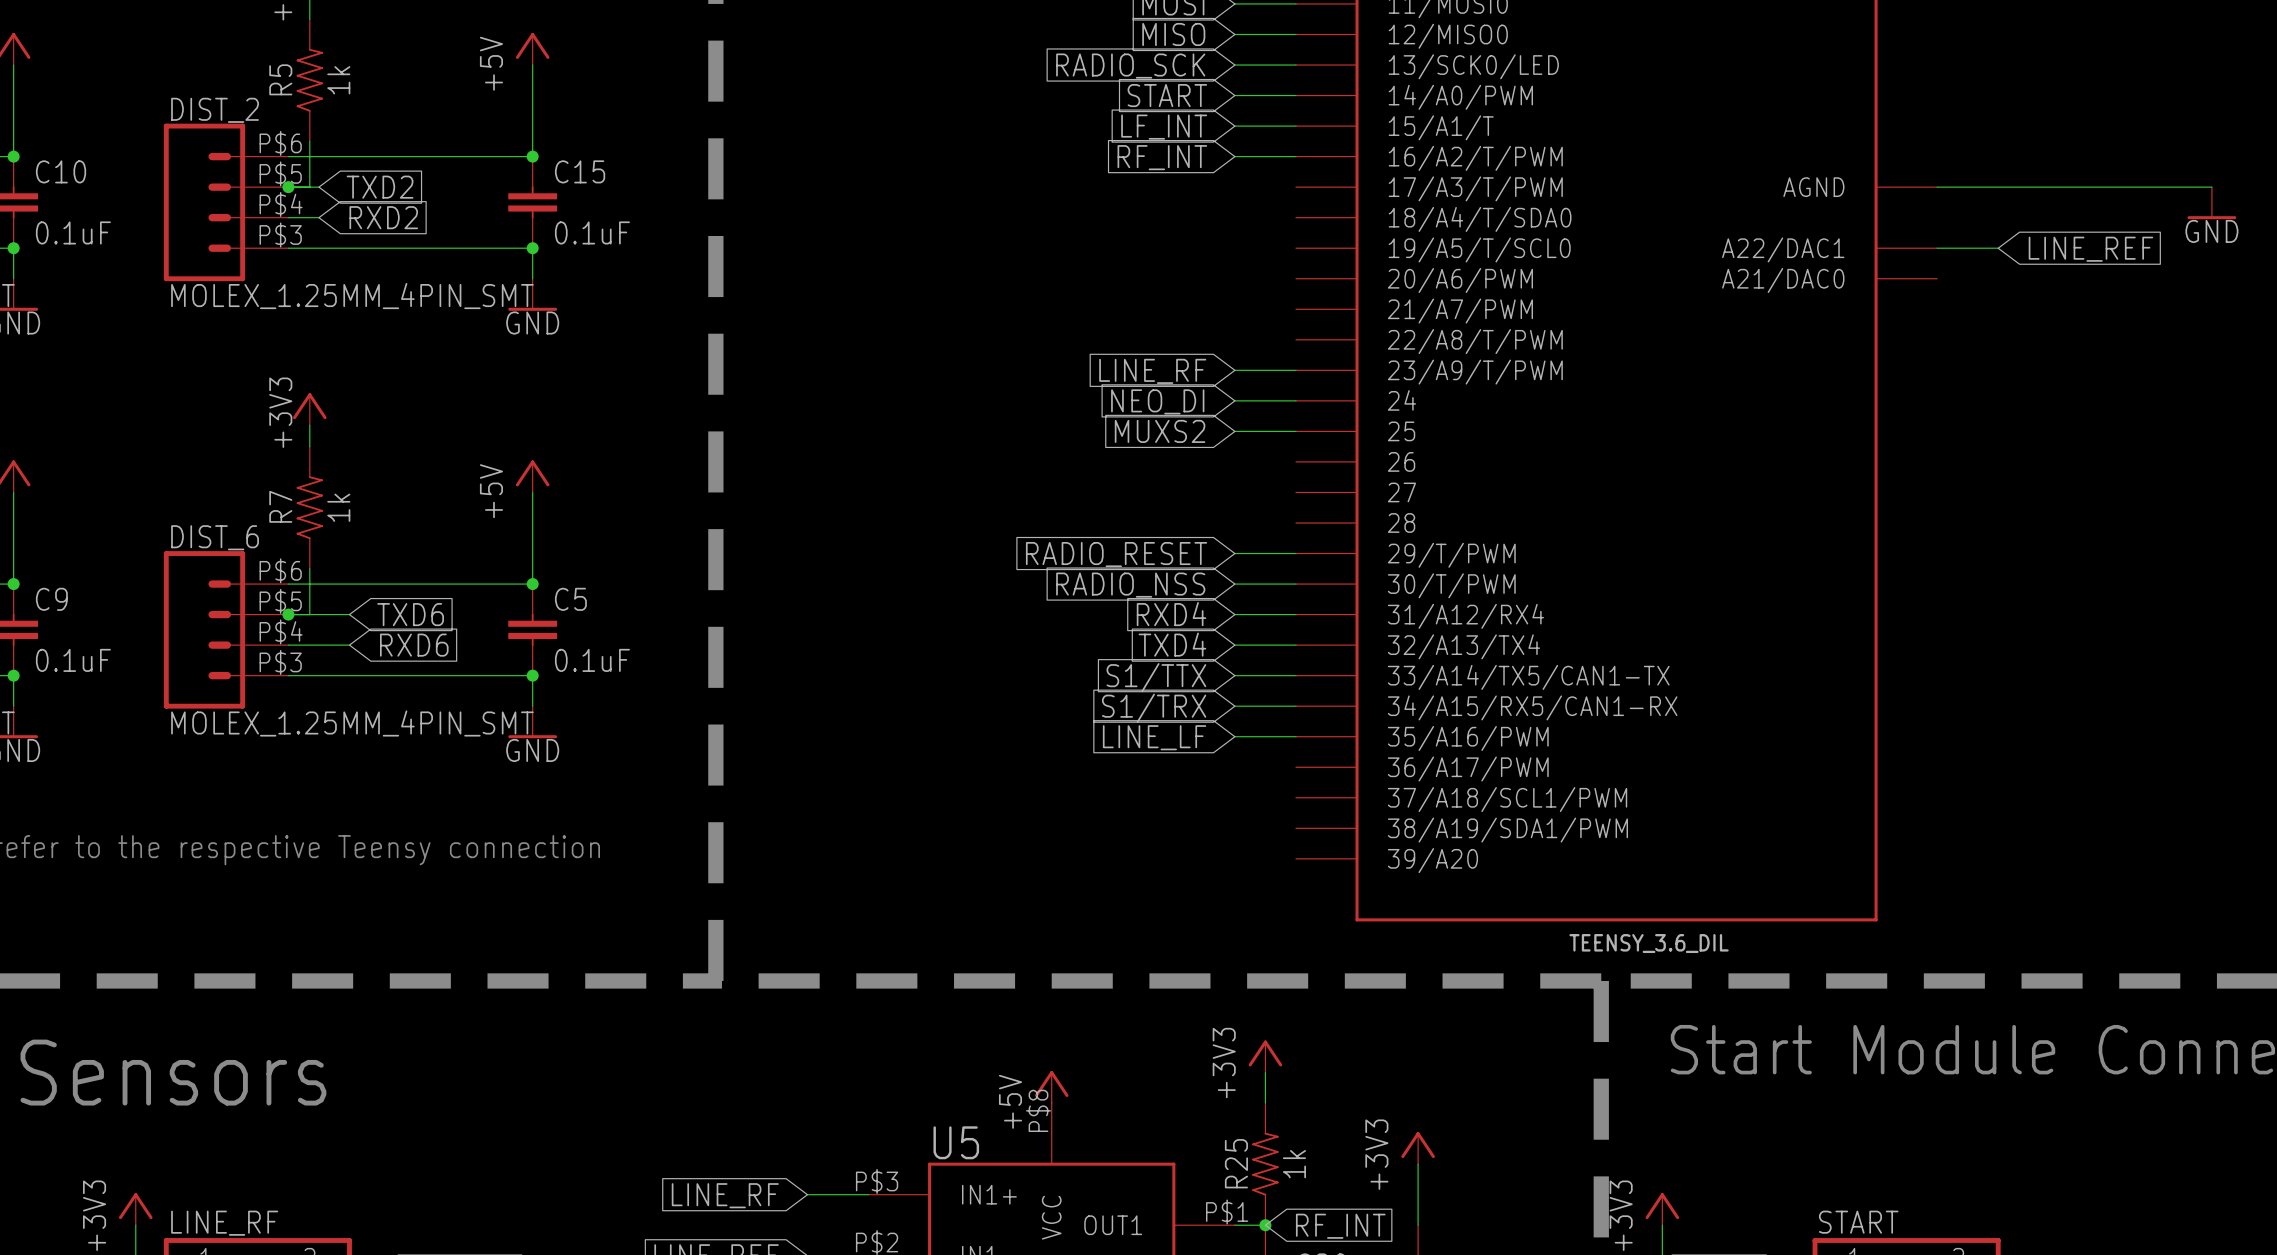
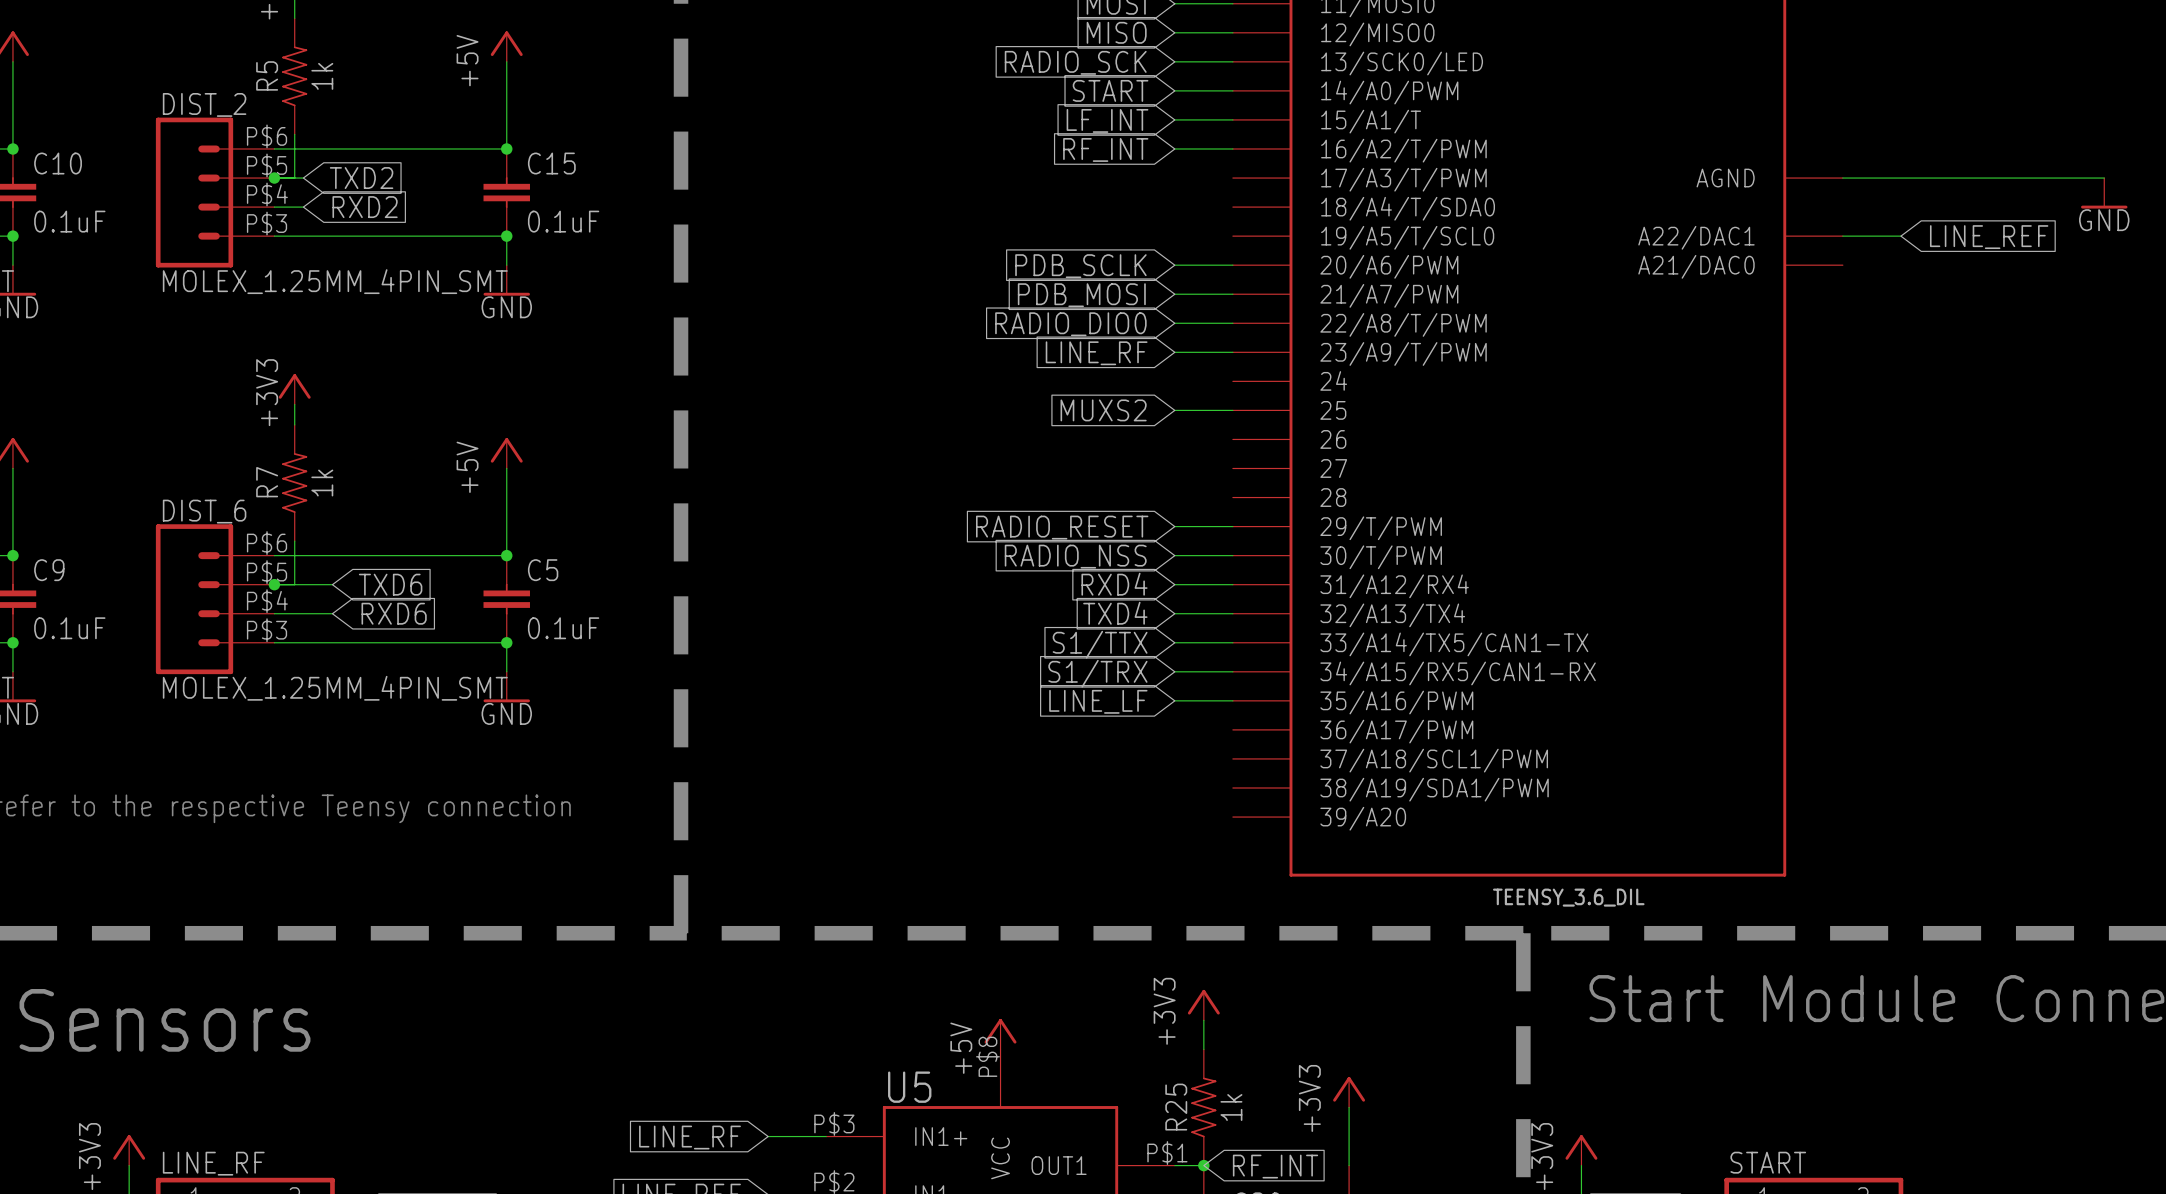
wire: none -> (1174, 265) (1232, 265)
global label: none -> PDB_SCLK (1080, 266)
wire: none -> (1174, 294) (1232, 294)
global label: none -> PDB_MOSI (1081, 295)
global label: none -> RADIO_DIO0 (1070, 324)
wire: (1234, 400) (1295, 400) -> (1174, 323) (1232, 323)
global label: NEO_DI (1157, 401) -> none

